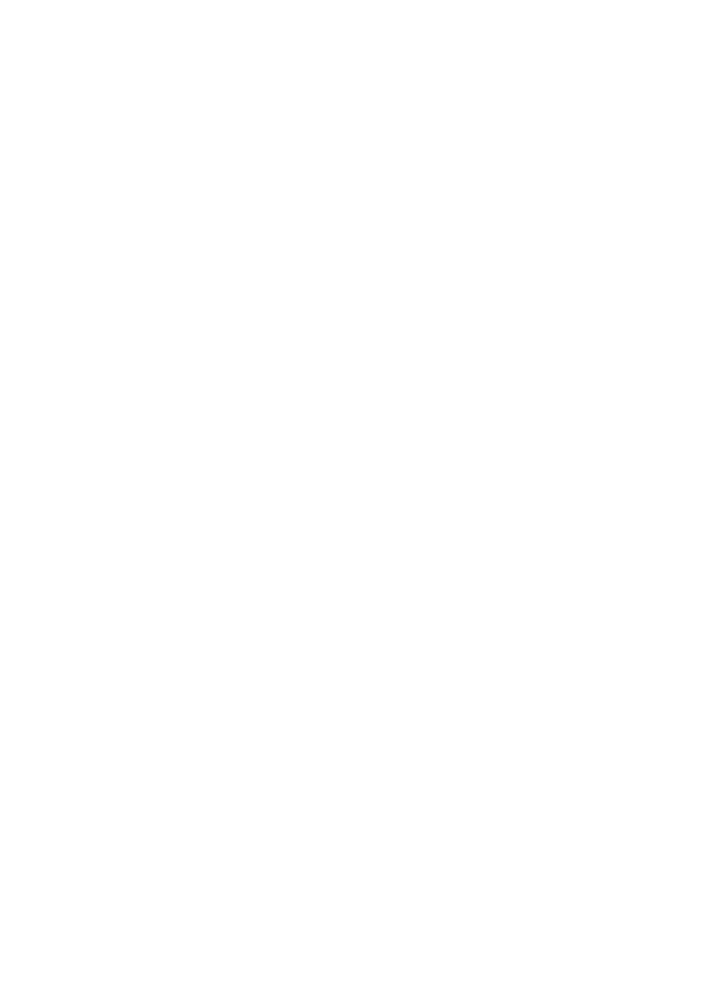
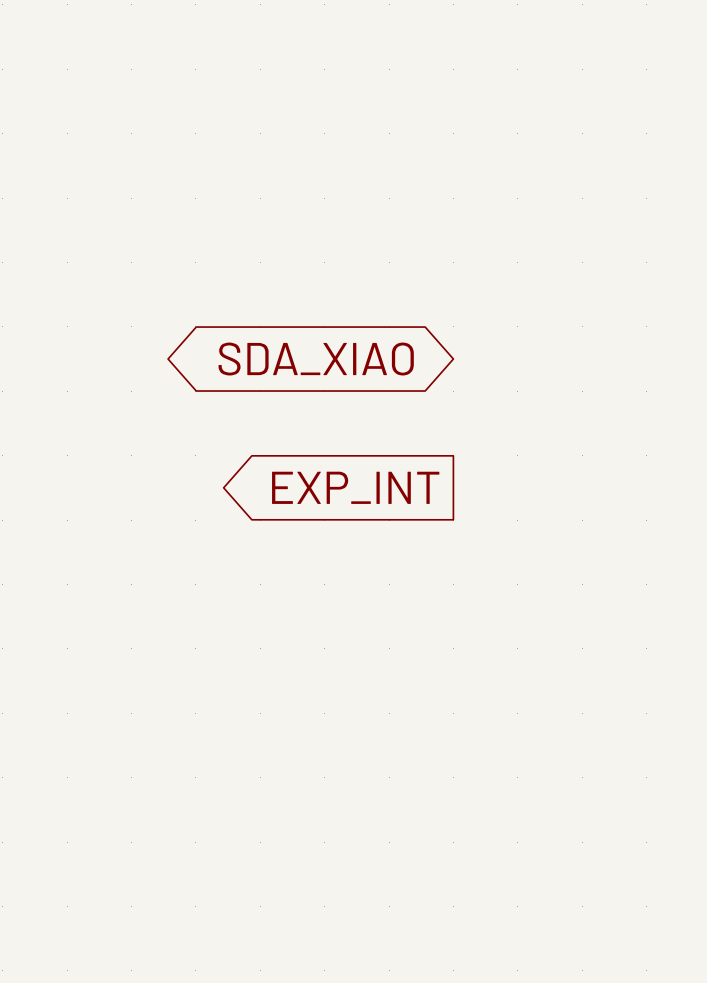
global label: none -> SDA_XIAO (316, 359)
global label: none -> EXP_INT (355, 487)

